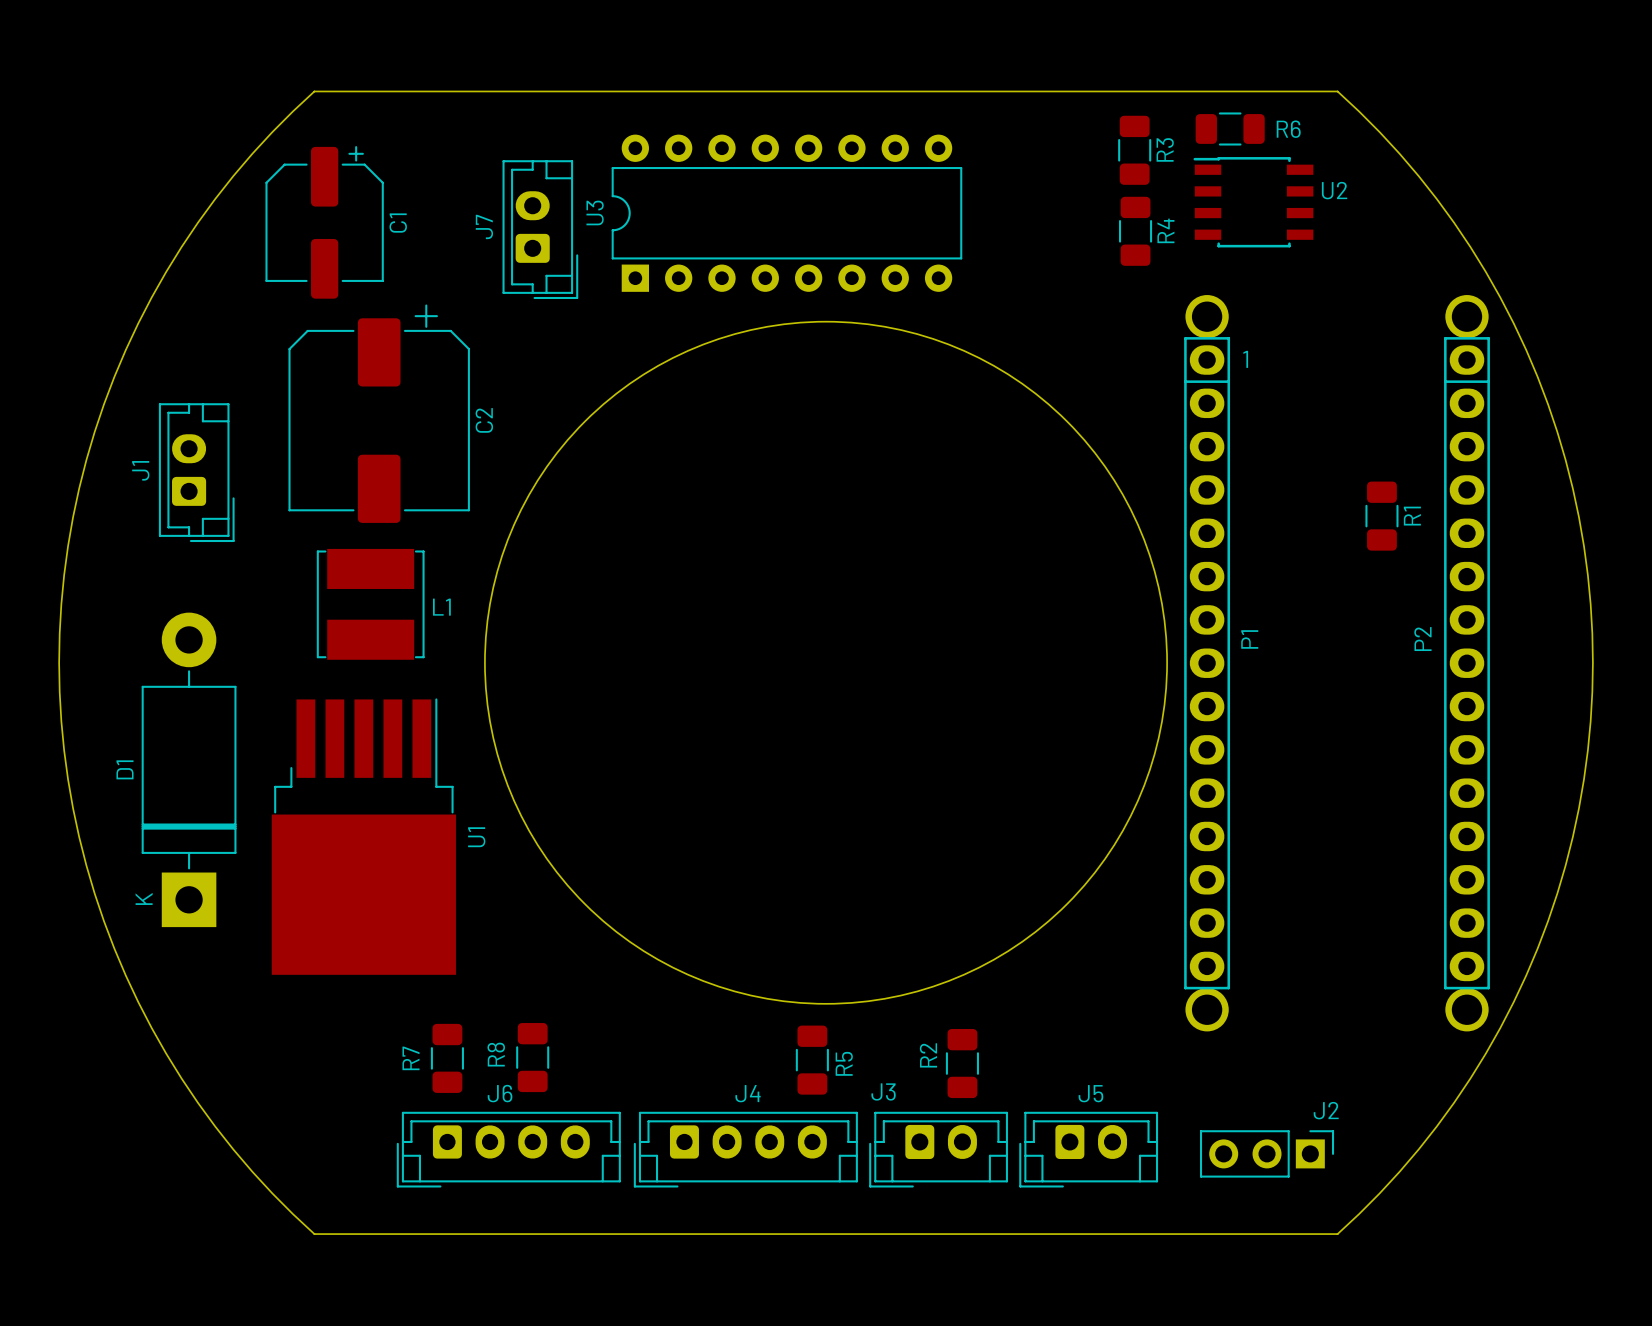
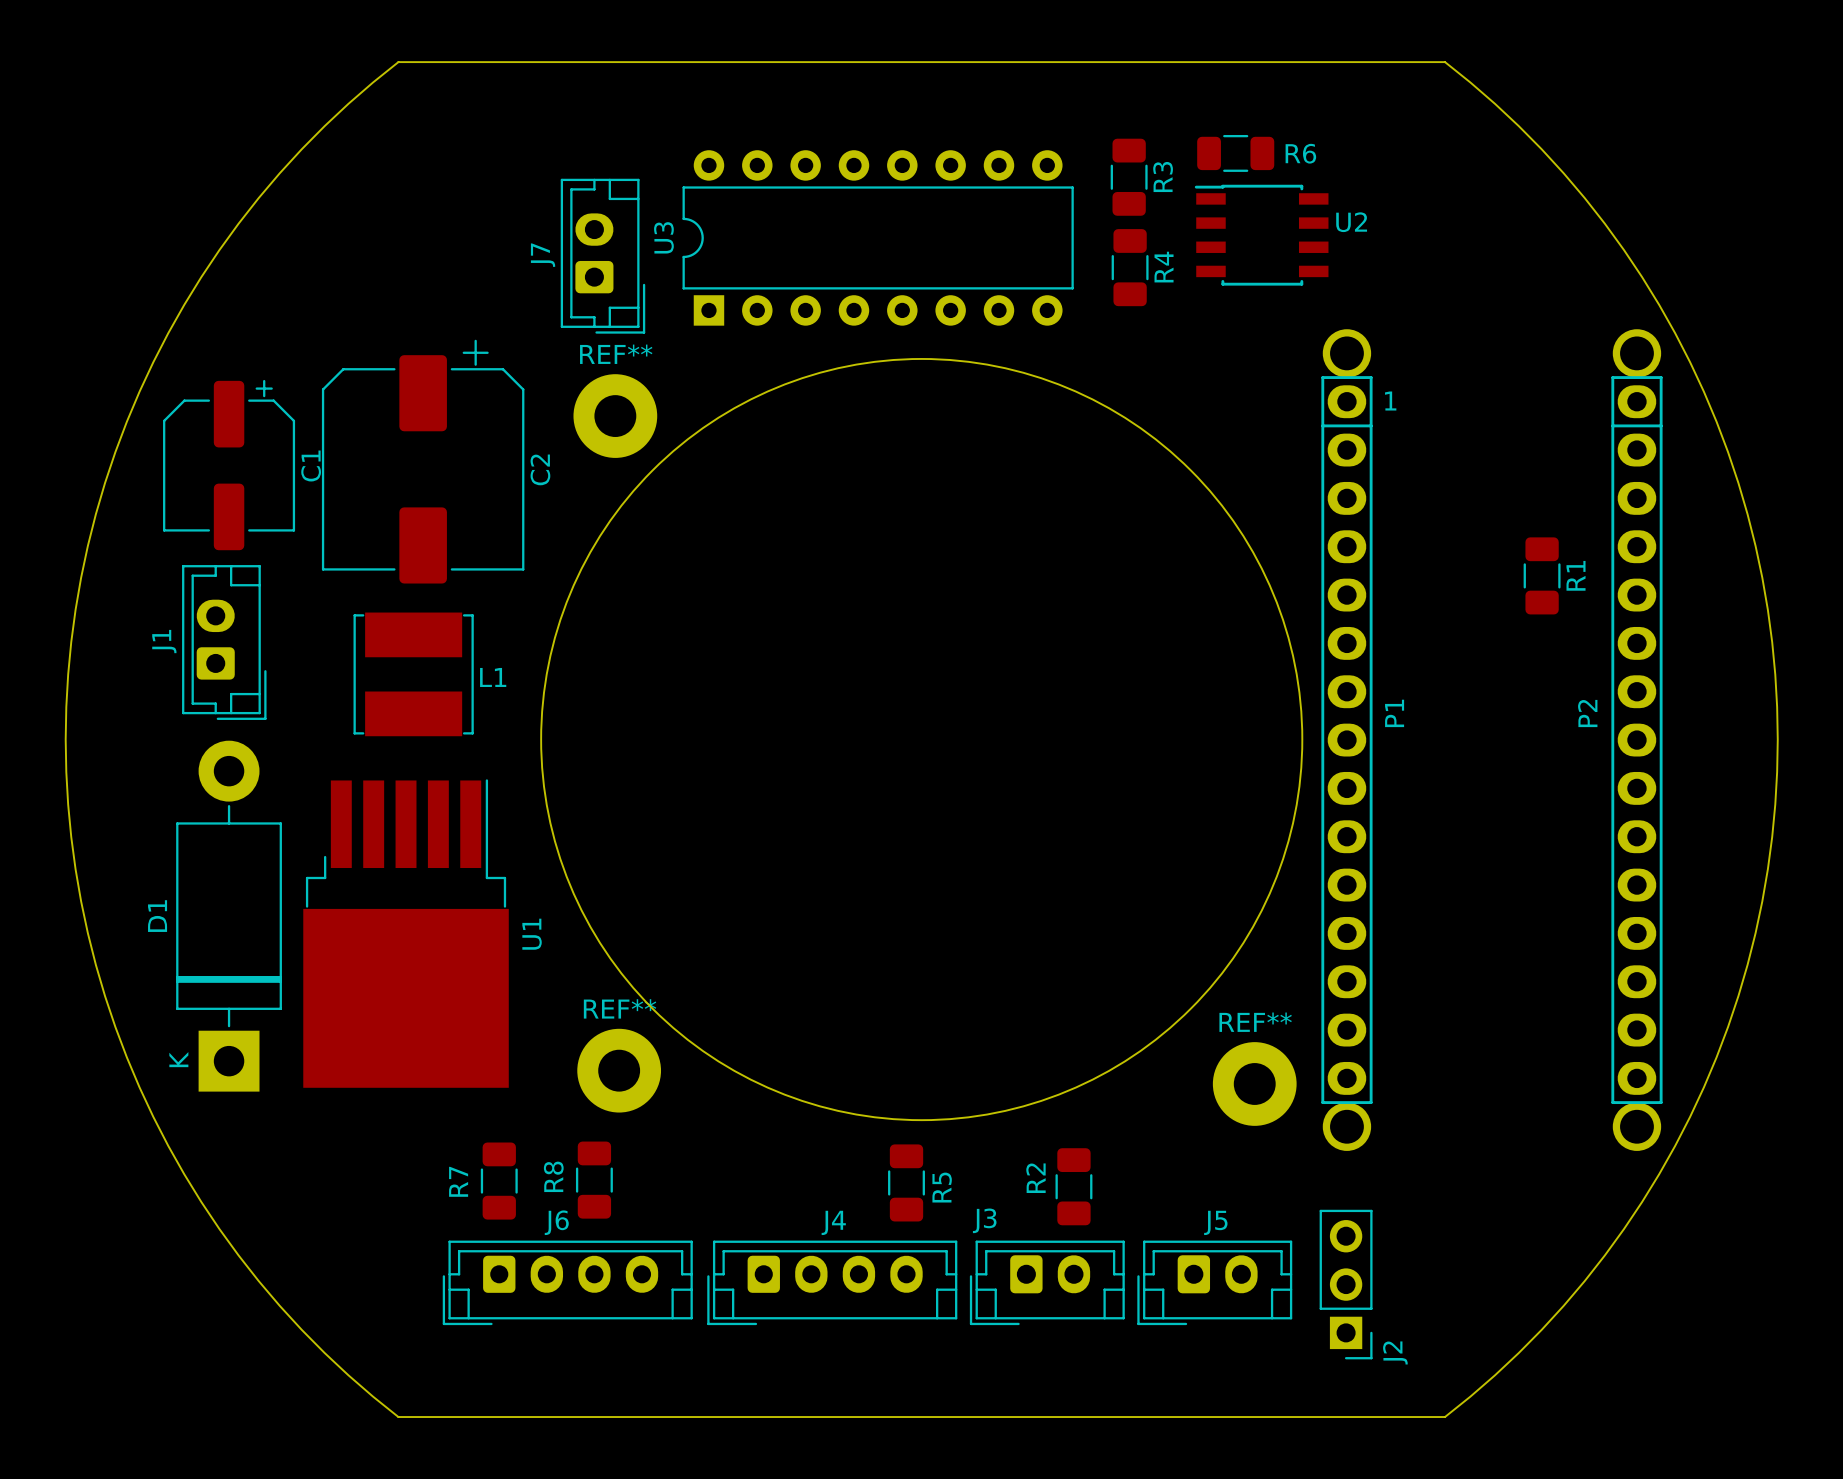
board edge: (314, 91) (1337, 91) (1399, 153) (1454, 222) (1485, 271) (1526, 349) (1548, 404) (1572, 488) (1587, 575) (1592, 662) (1590, 721) (1578, 808) (1565, 865) (1537, 948) (1513, 1002) (1470, 1078) (1436, 1126) (1379, 1193) (1337, 1234) (314, 1234) (252, 1171) (215, 1126) (166, 1053) (125, 975) (104, 921) (79, 837) (68, 779) (61, 721) (59, 633) (68, 546) (79, 488) (104, 404) (138, 323) (181, 246) (215, 198) (252, 153) (314, 91) -> (398, 62) (1445, 62) (1495, 103) (1541, 149) (1604, 223) (1659, 304) (1703, 391) (1728, 452) (1755, 545) (1772, 642) (1777, 707) (1777, 772) (1767, 869) (1747, 964) (1728, 1026) (1690, 1116) (1659, 1174) (1624, 1229) (1563, 1305) (1518, 1353) (1445, 1417) (398, 1417) (348, 1375) (301, 1329) (238, 1255) (184, 1174) (153, 1116) (126, 1057) (95, 964) (75, 869) (68, 804) (65, 739) (71, 642) (81, 577) (105, 483) (139, 391) (168, 333) (219, 250) (279, 173) (348, 103) (398, 62)
R6 position: (1230, 128) -> (1235, 153)
R3 position: (1134, 150) -> (1129, 177)
U2 position: (1253, 202) -> (1261, 235)
C1 position: (324, 222) -> (229, 465)
R4 position: (1135, 231) -> (1130, 267)
REF**: none -> (615, 416)
J1 position: (196, 472) -> (224, 642)
D1 position: (189, 769) -> (229, 916)
REF**: none -> (619, 1070)
REF**: none -> (1254, 1083)
J2 rotation: 0° (1267, 1153) -> 90° clockwise (1346, 1284)

